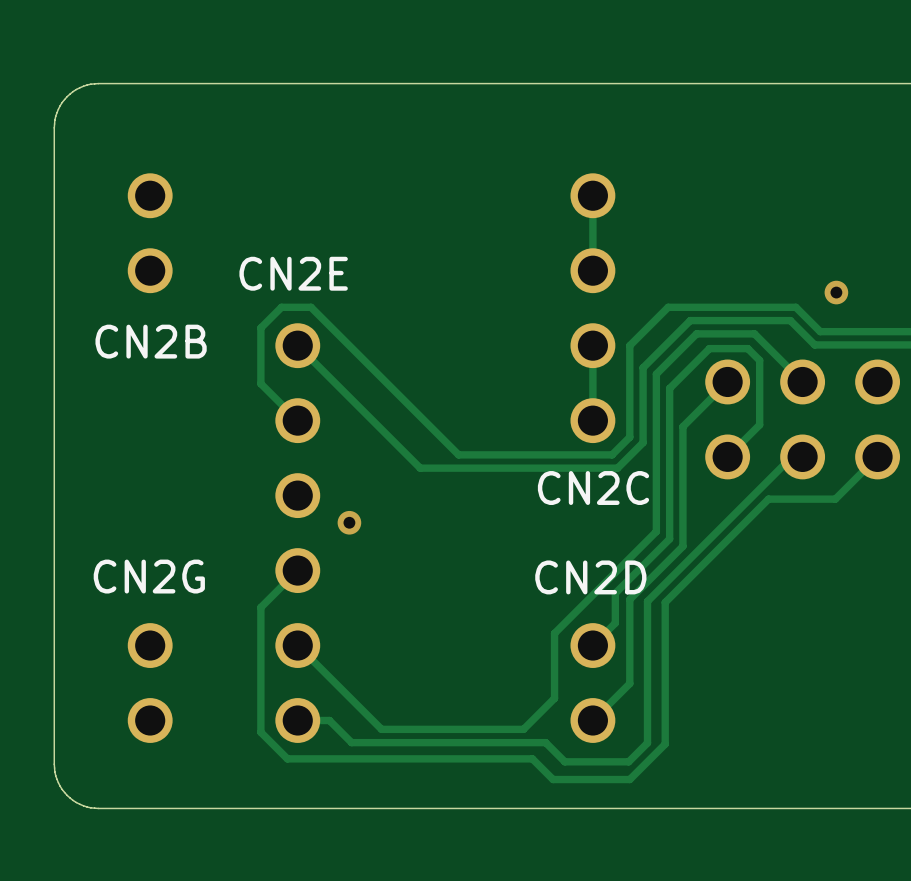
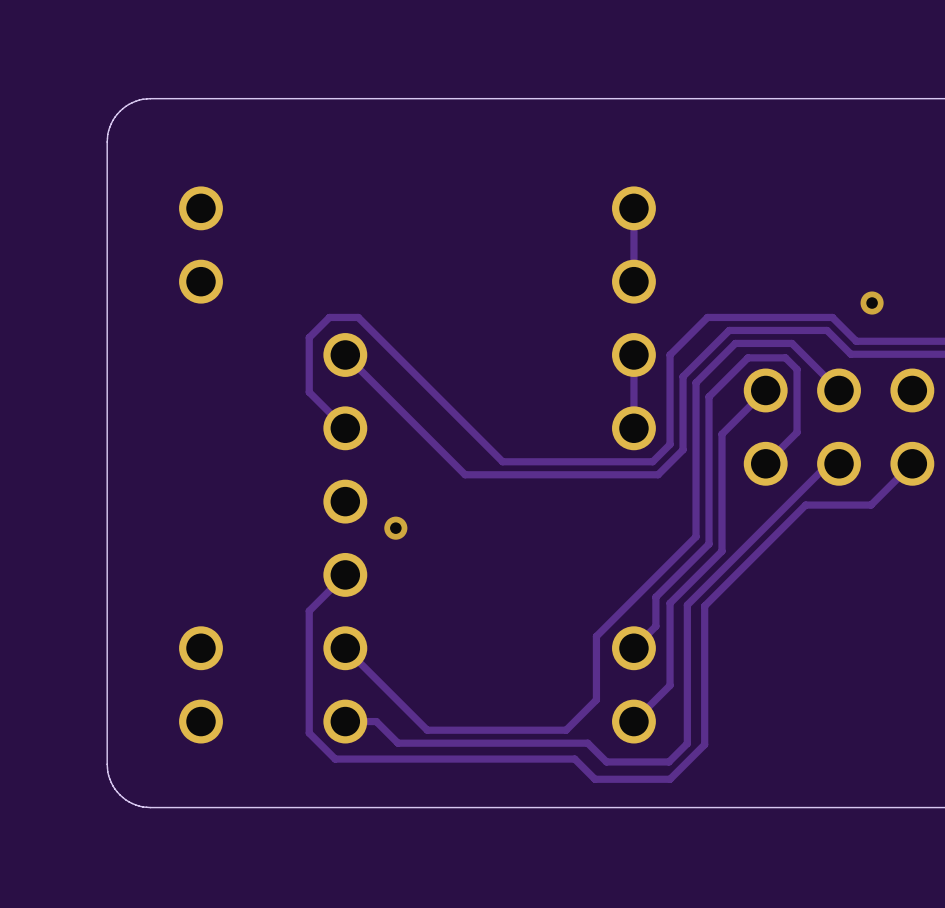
text: CN2E (293, 273) -> none
text: CN2B (151, 341) -> none
text: CN2C (593, 488) -> none
text: CN2G (149, 576) -> none
text: CN2D (590, 577) -> none

